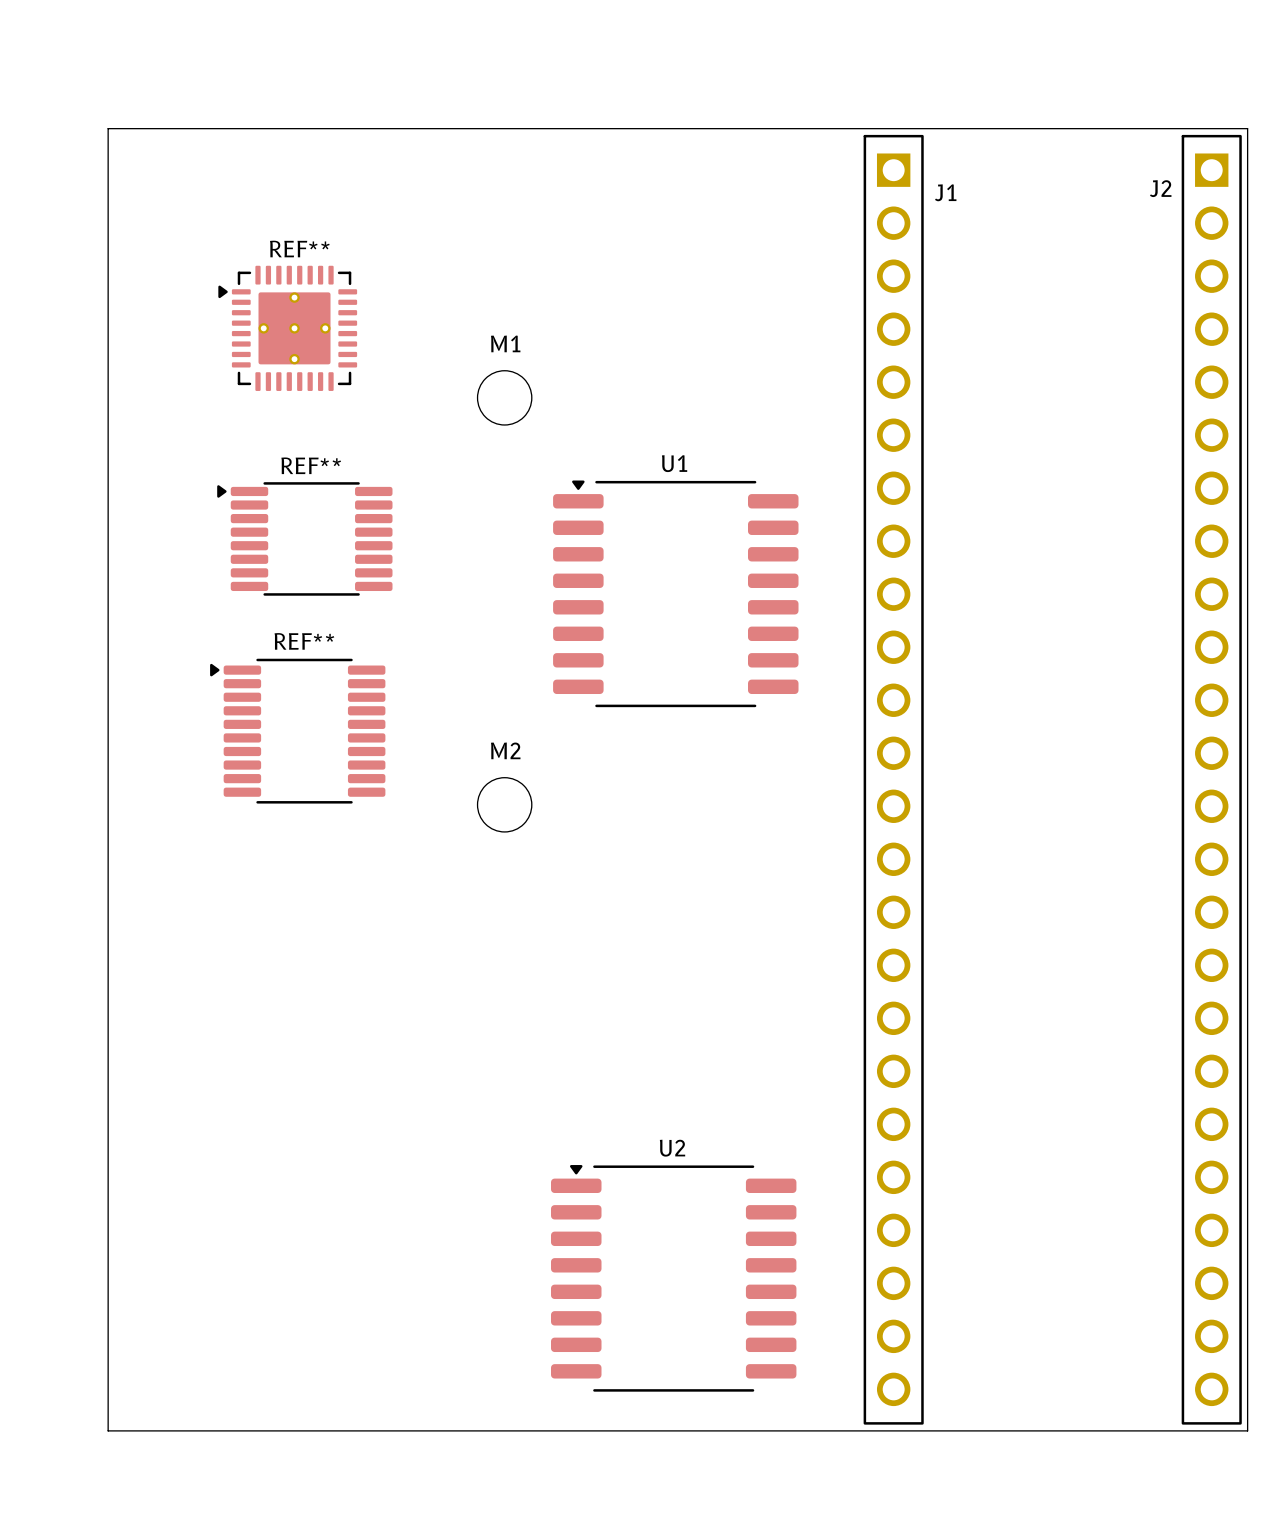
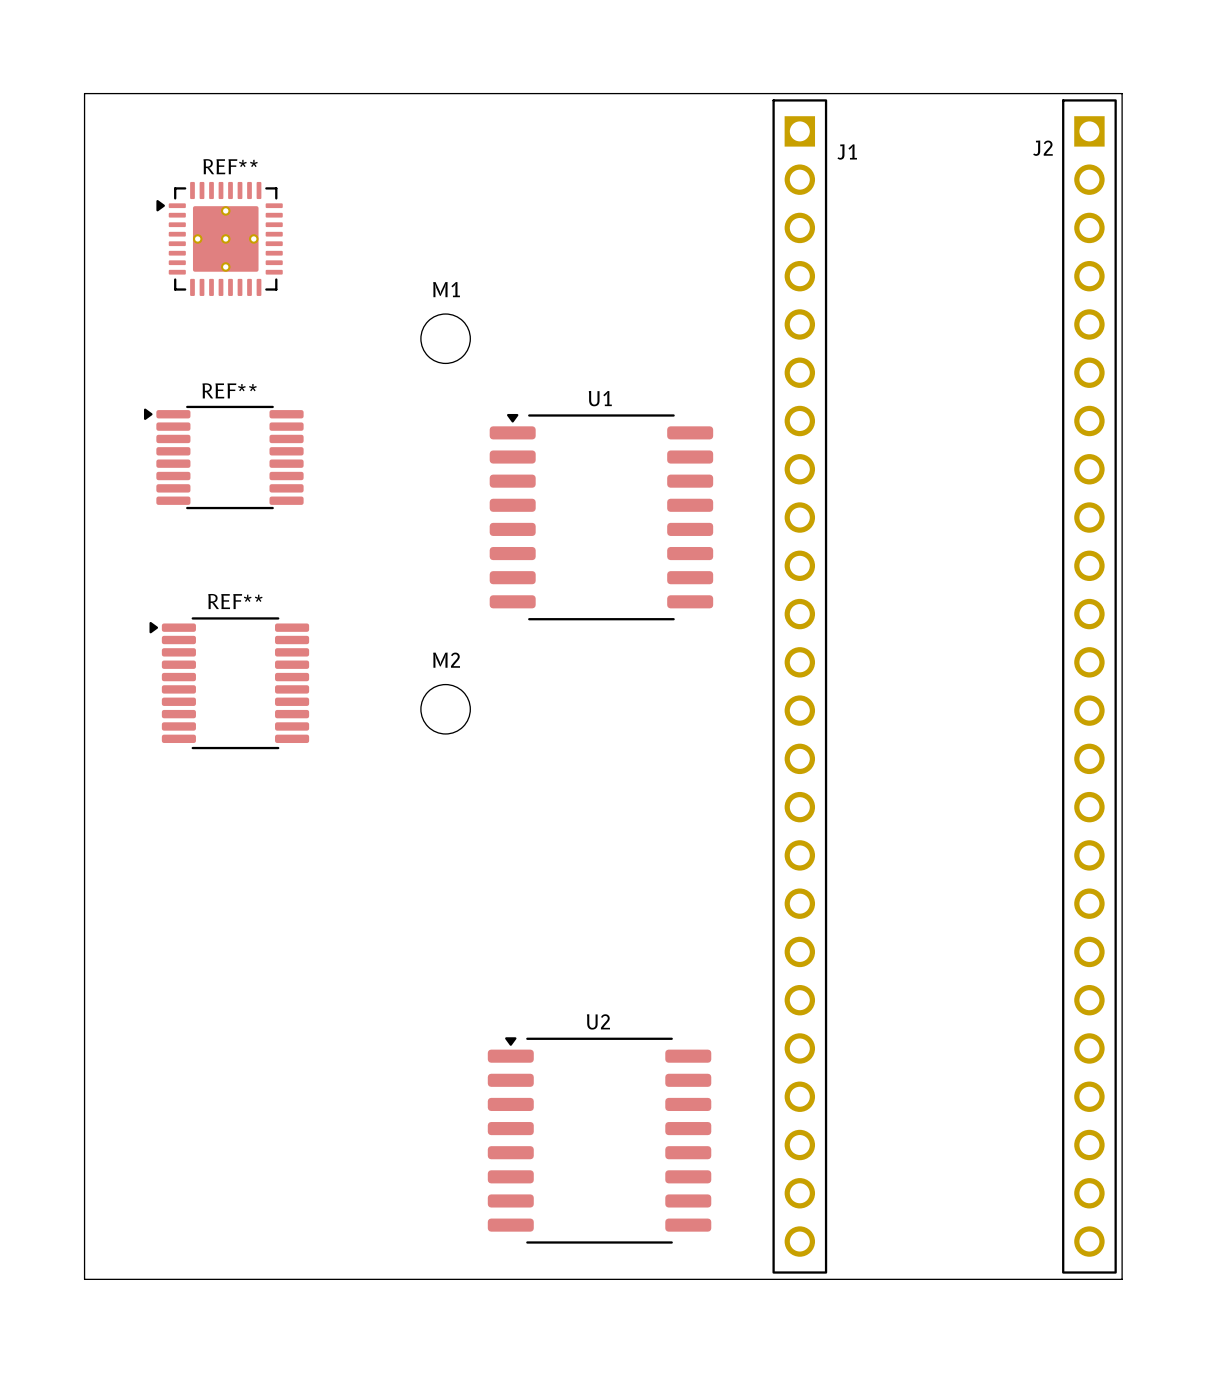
REF** position: (287, 328) -> (219, 238)
REF** position: (304, 538) -> (223, 457)
REF** position: (297, 731) -> (229, 683)

